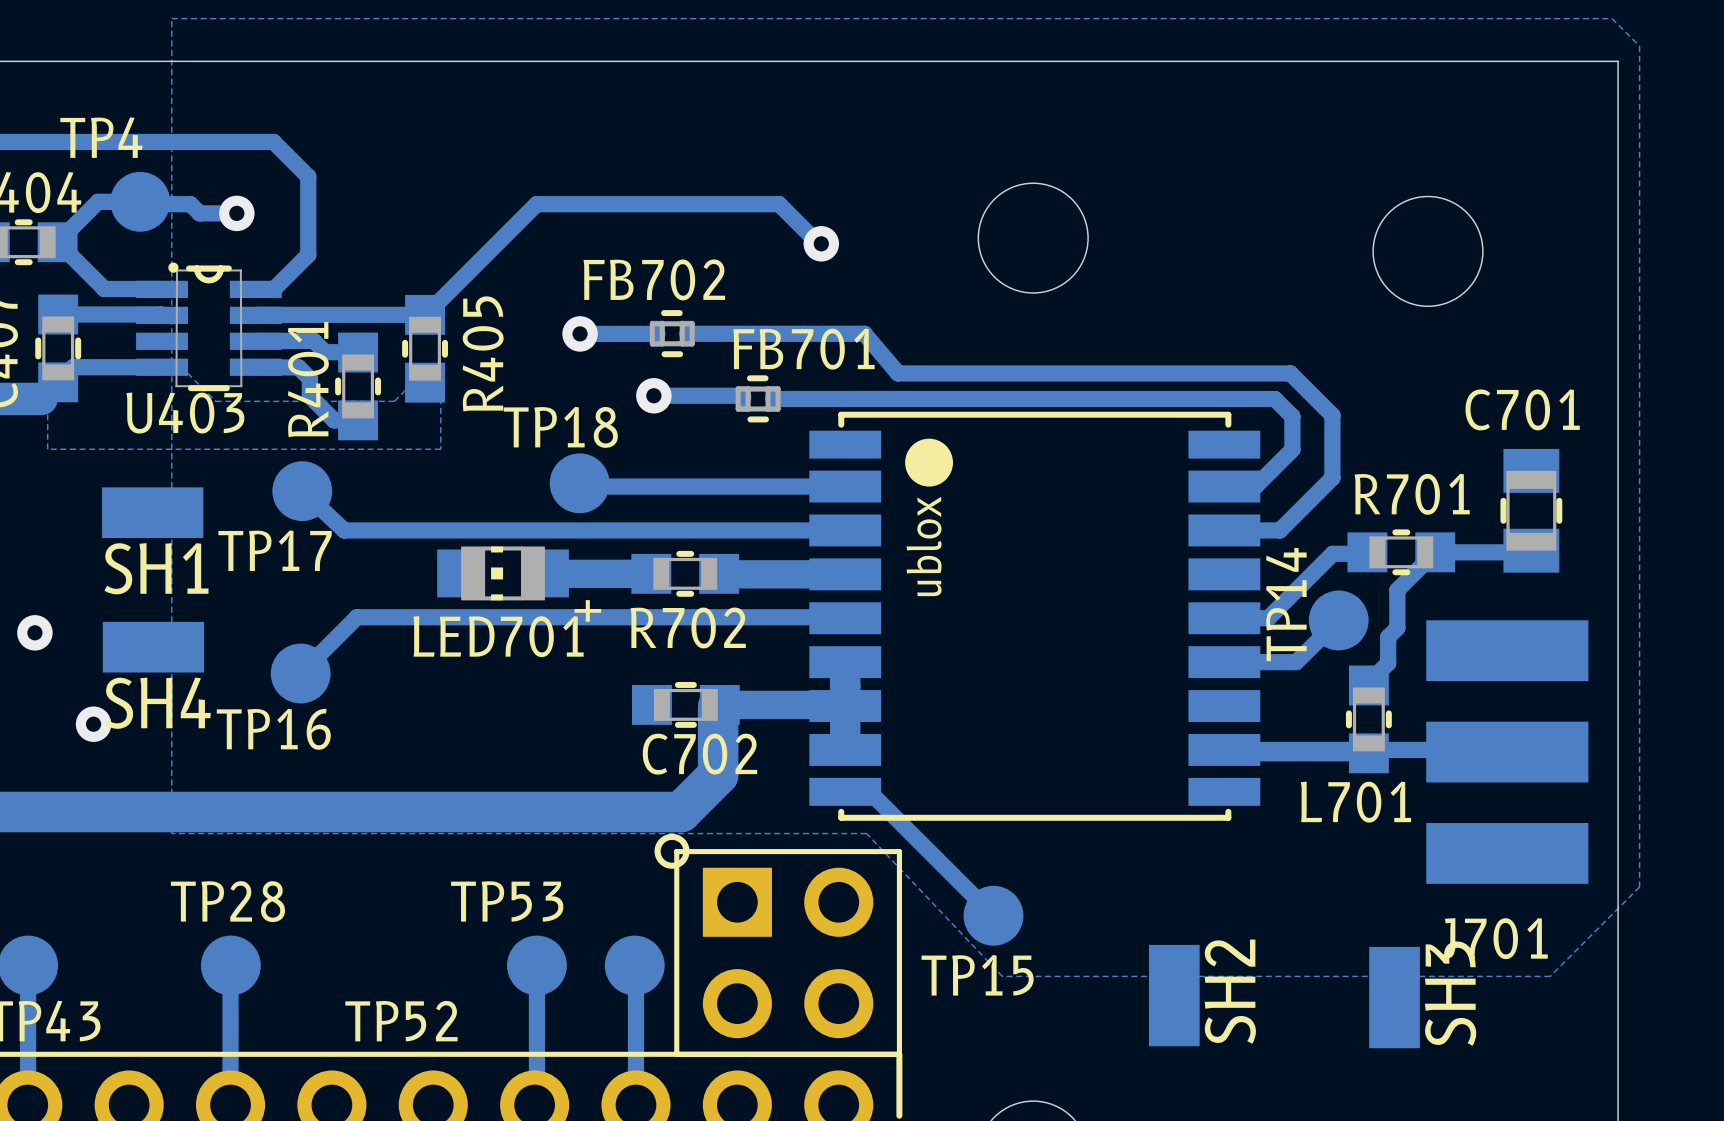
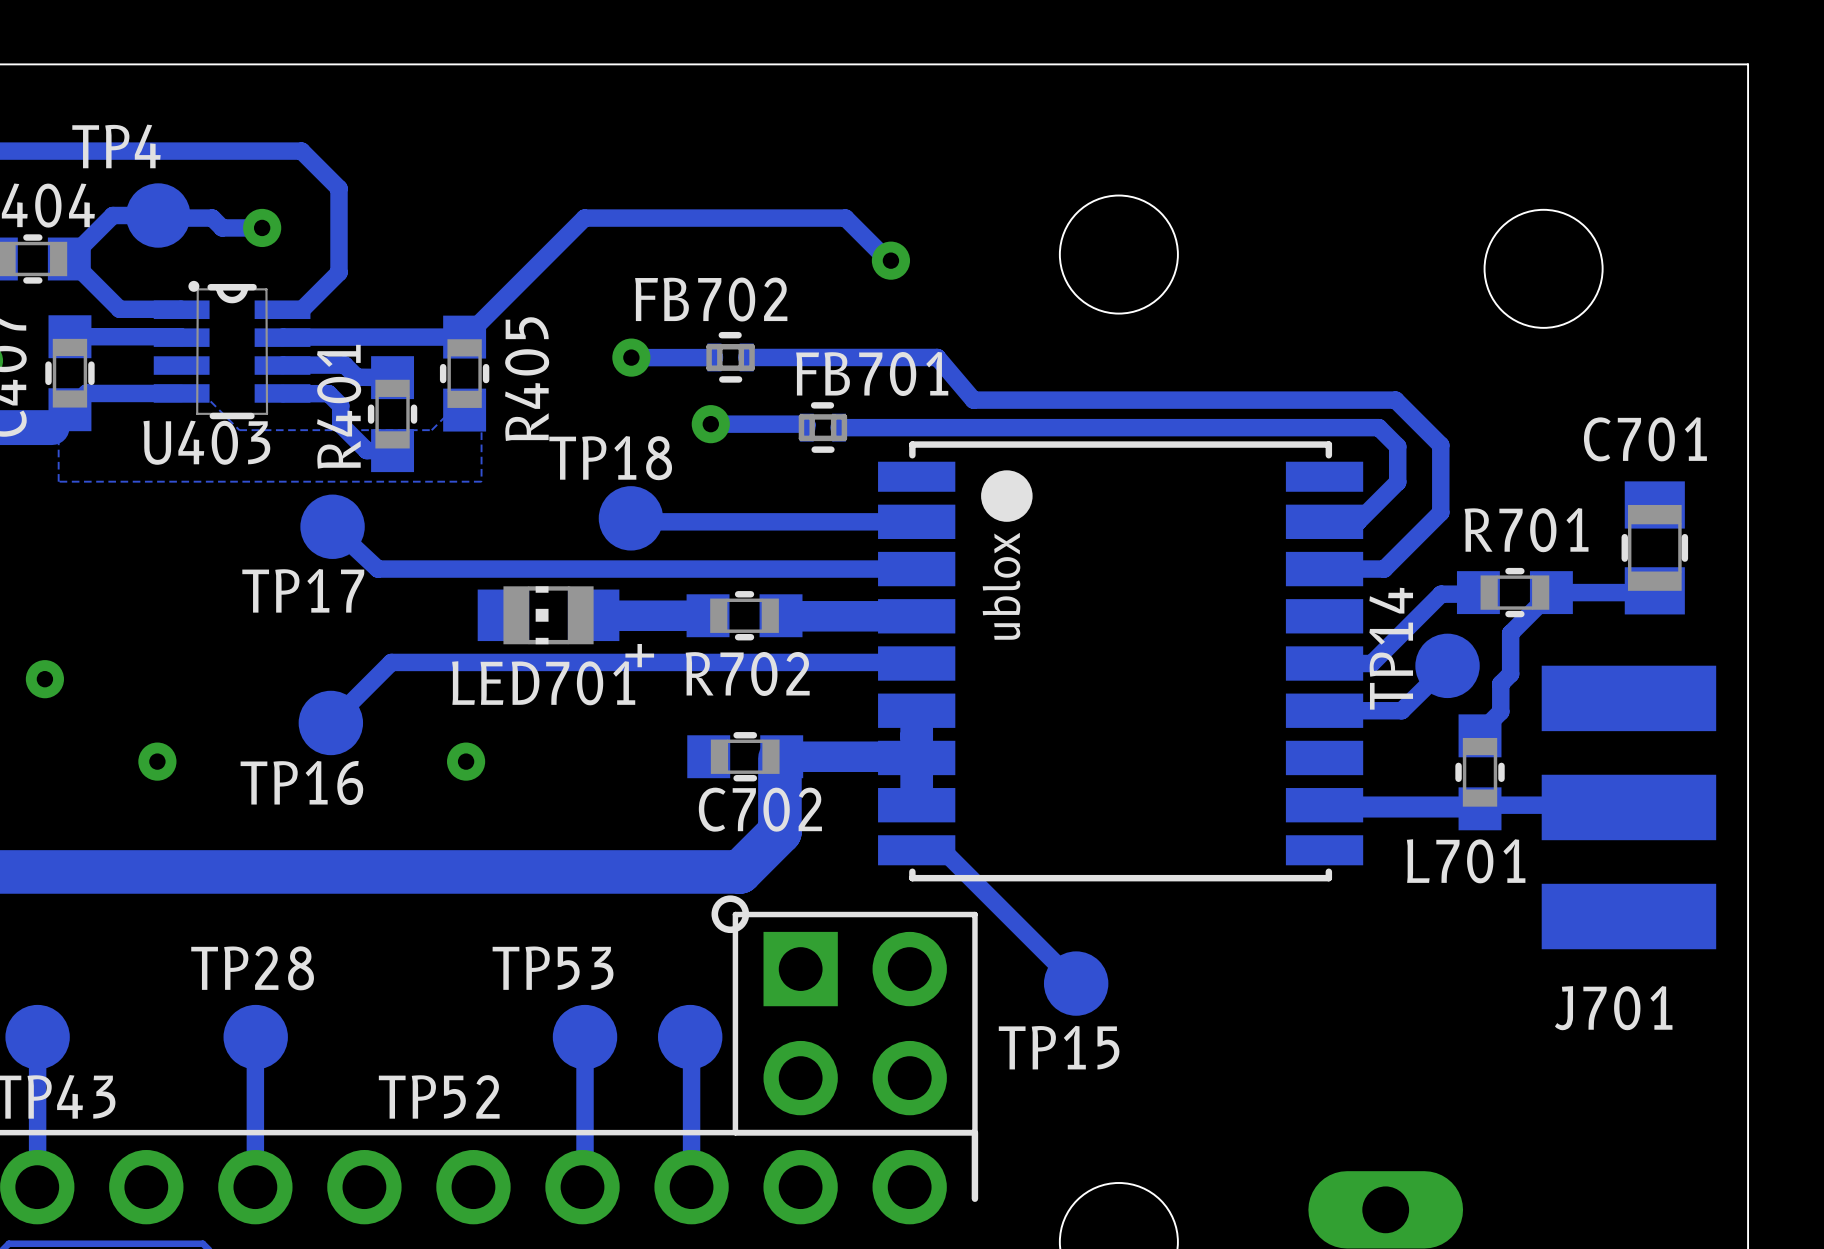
zone outline: (1612, 18) (171, 18) (171, 833) (866, 833) (1002, 976) (1550, 976) (1639, 887) (1639, 46) (1612, 18) -> none
SH1: (152, 512) -> none
SH4: (153, 647) -> none
via: none -> (466, 761)
via position: (93, 724) -> (157, 761)
SH2: (1174, 995) -> none
SH3: (1394, 997) -> none

